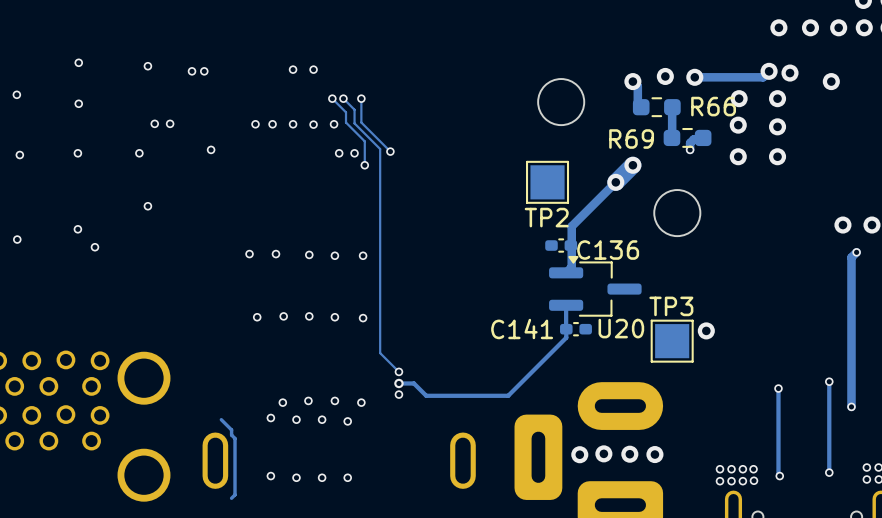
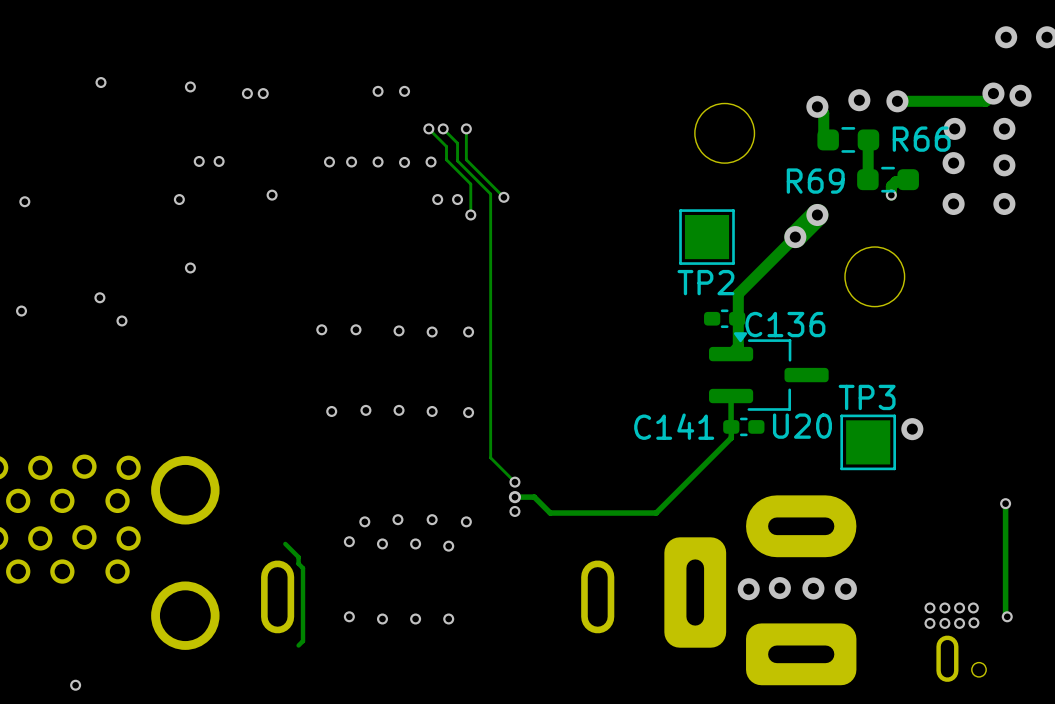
via: (16, 94) -> none
via: (78, 103) -> none
via: (77, 153) -> none

